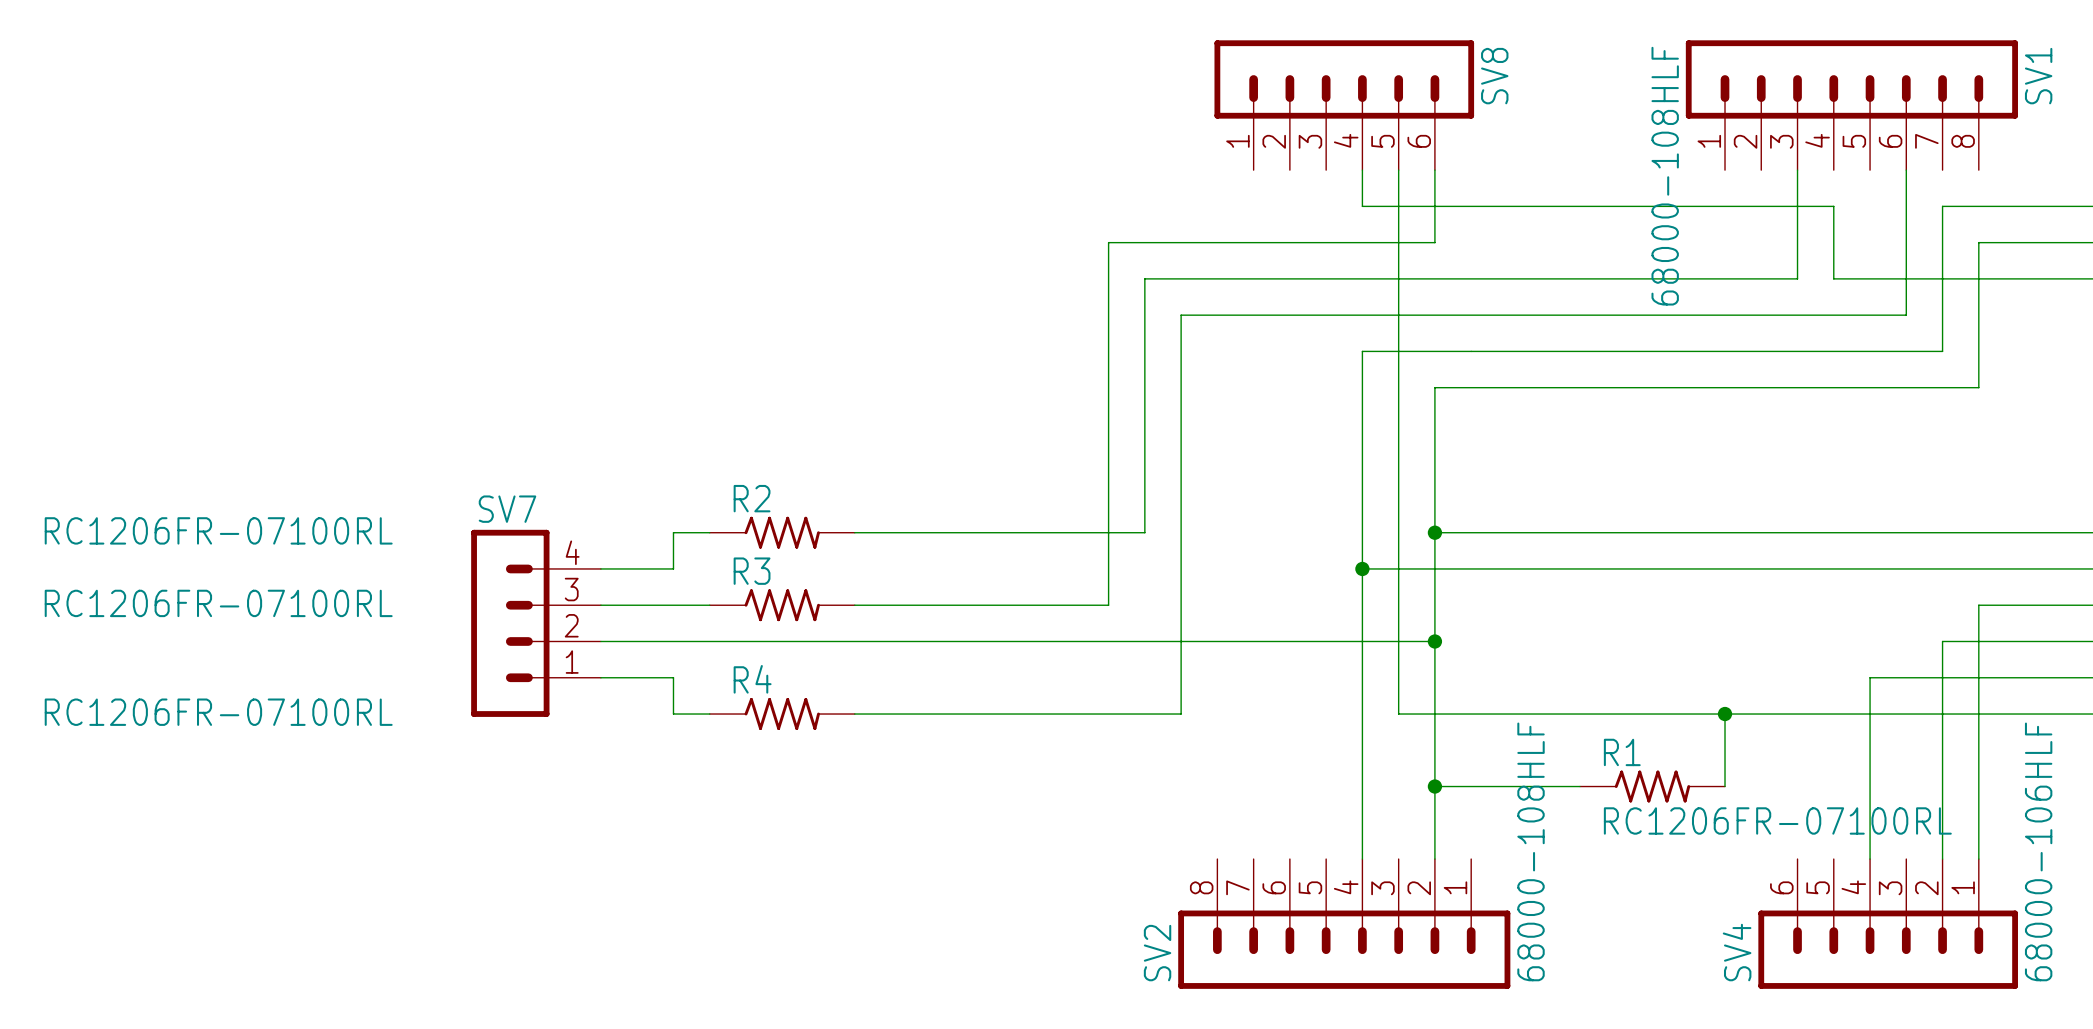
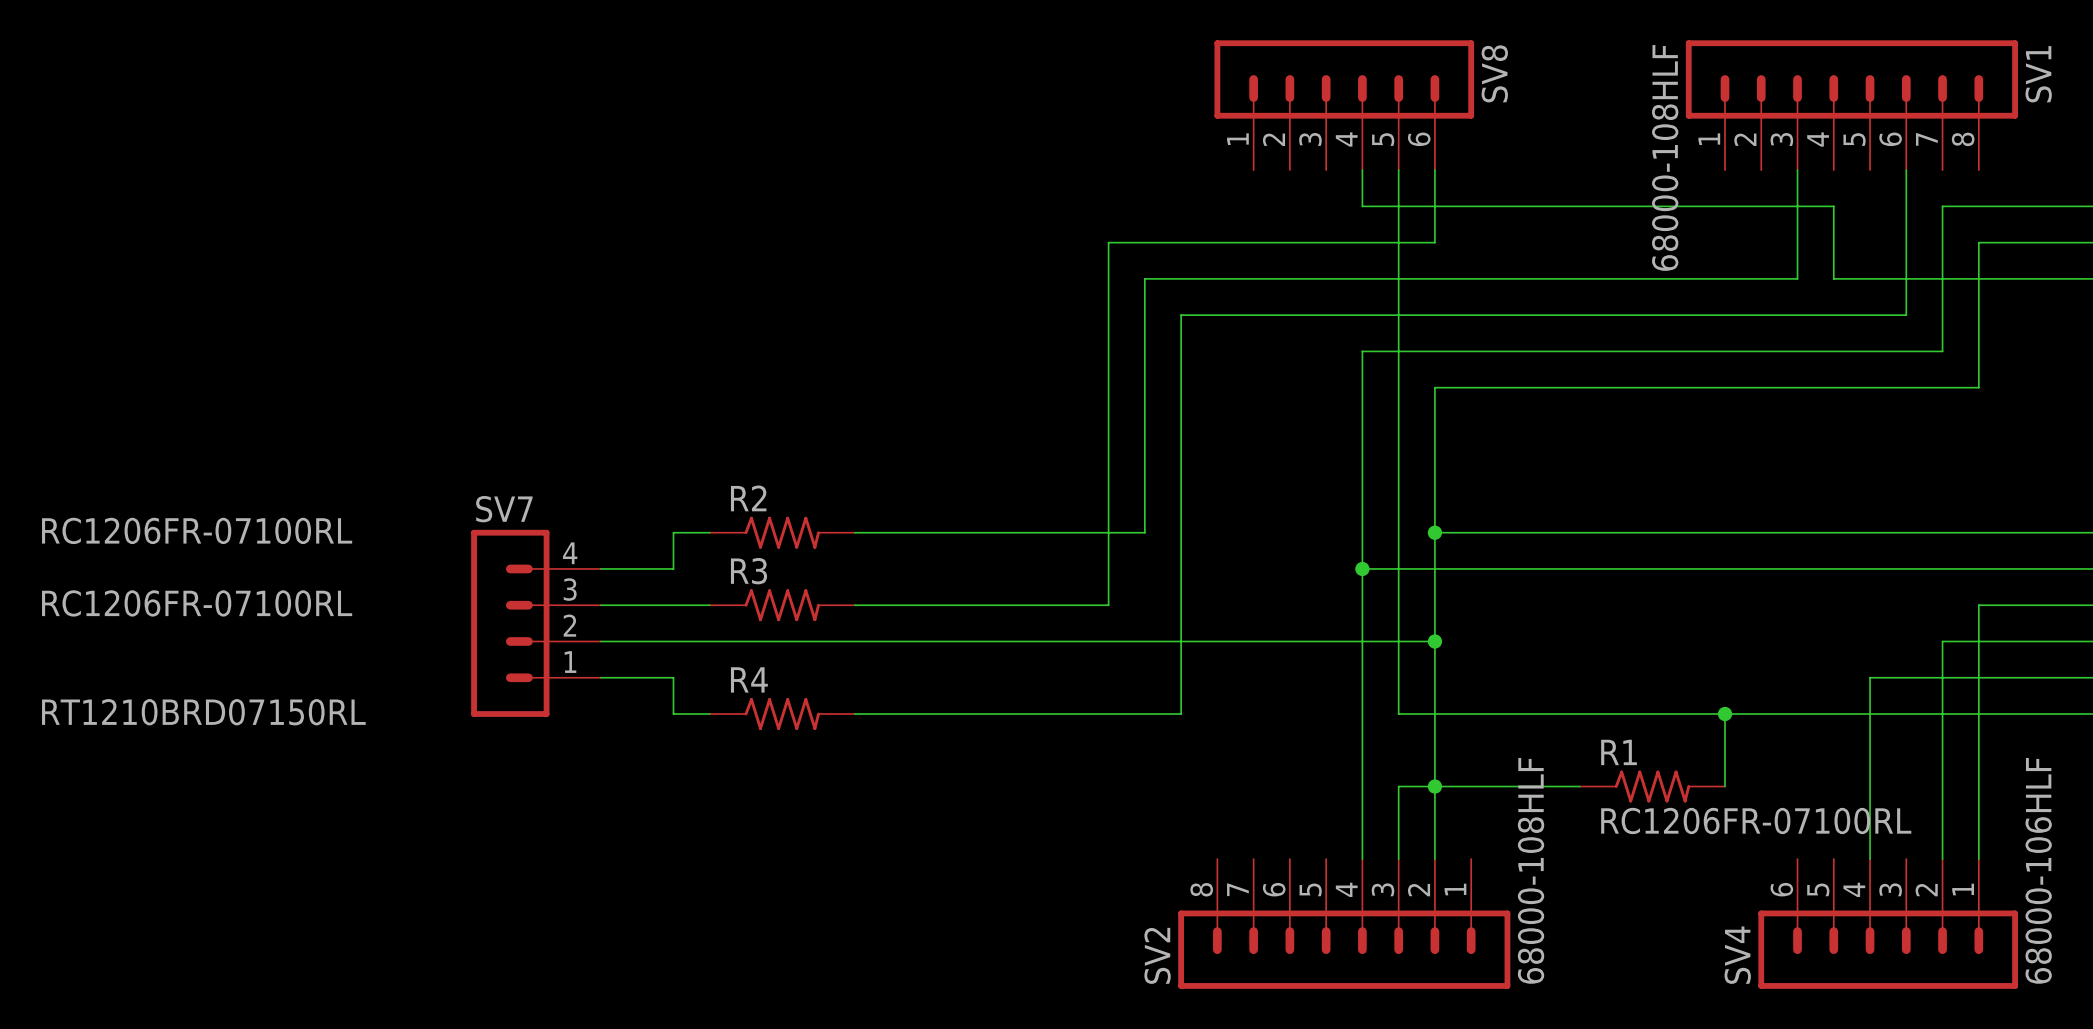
R4 value: RC1206FR-07100RL (218, 712) -> RT1210BRD07150RL (203, 712)
wire: none -> (1434, 786) (1398, 786) (1398, 859)

